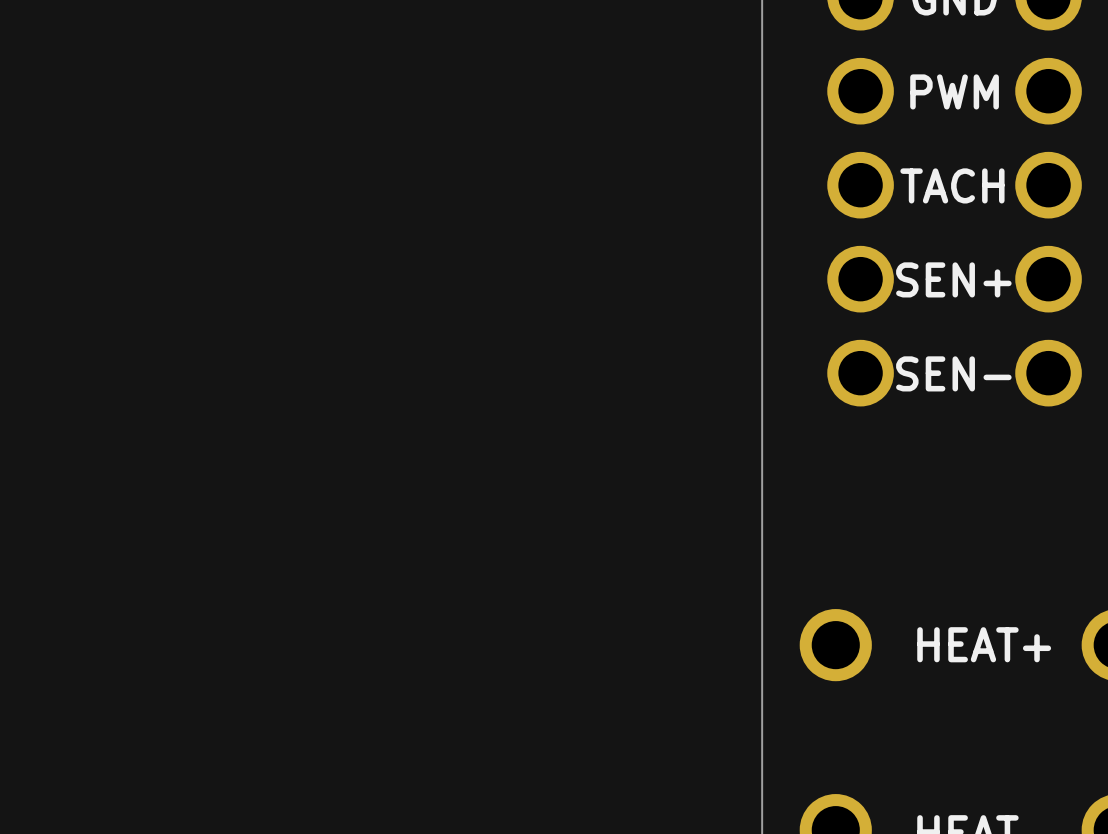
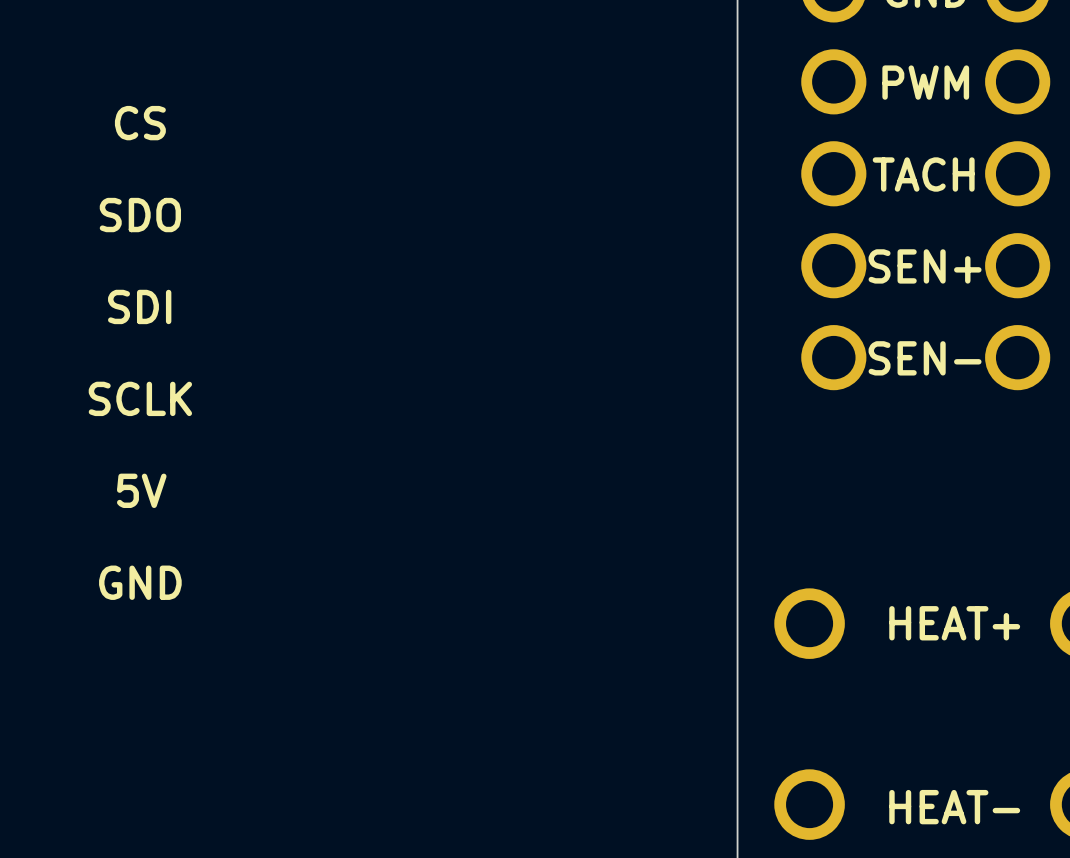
text: none -> CS (140, 123)
text: none -> SDO (140, 215)
text: none -> SDI (139, 306)
text: none -> SCLK (140, 398)
text: none -> 5V (141, 490)
text: none -> GND (140, 582)

